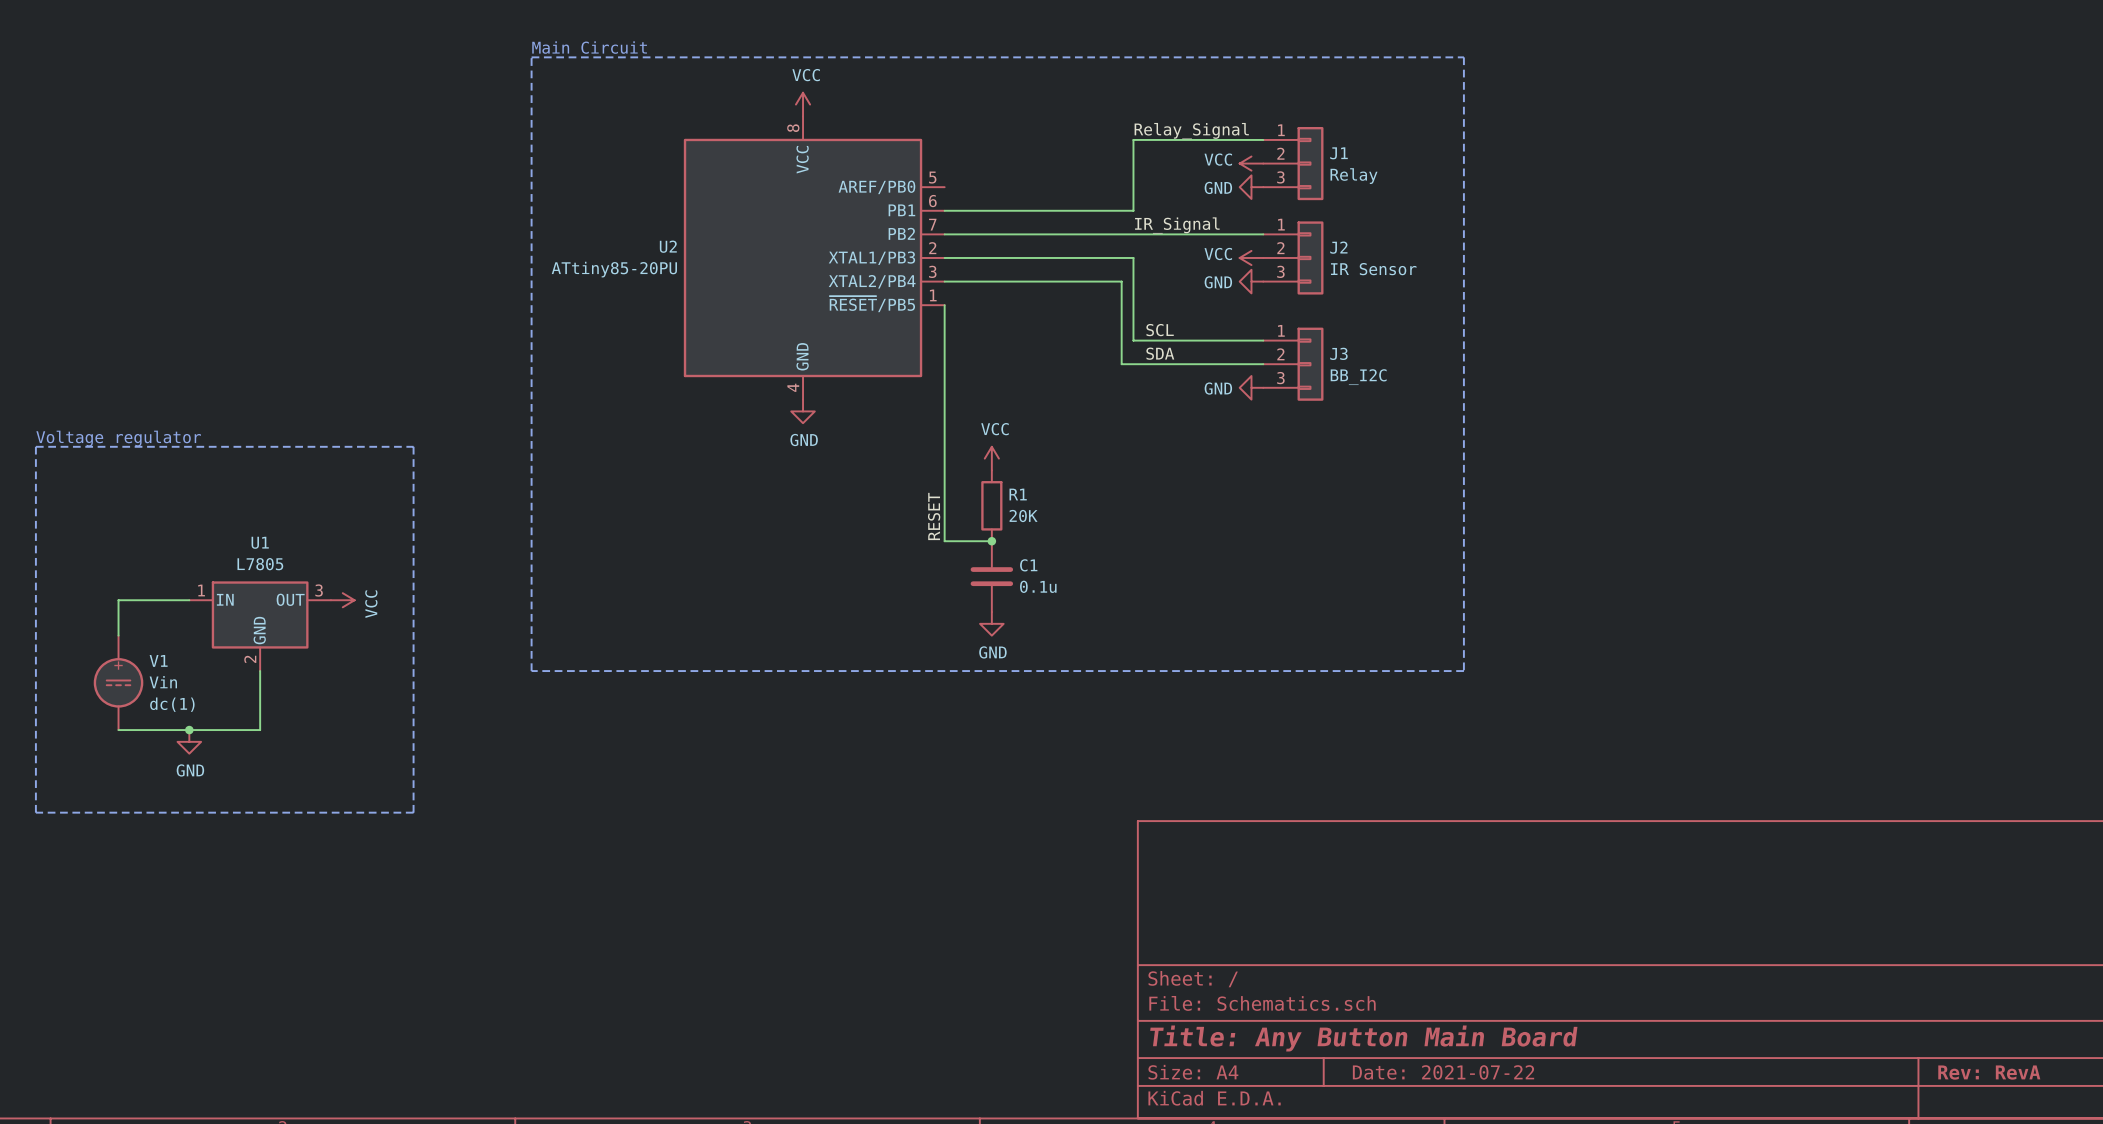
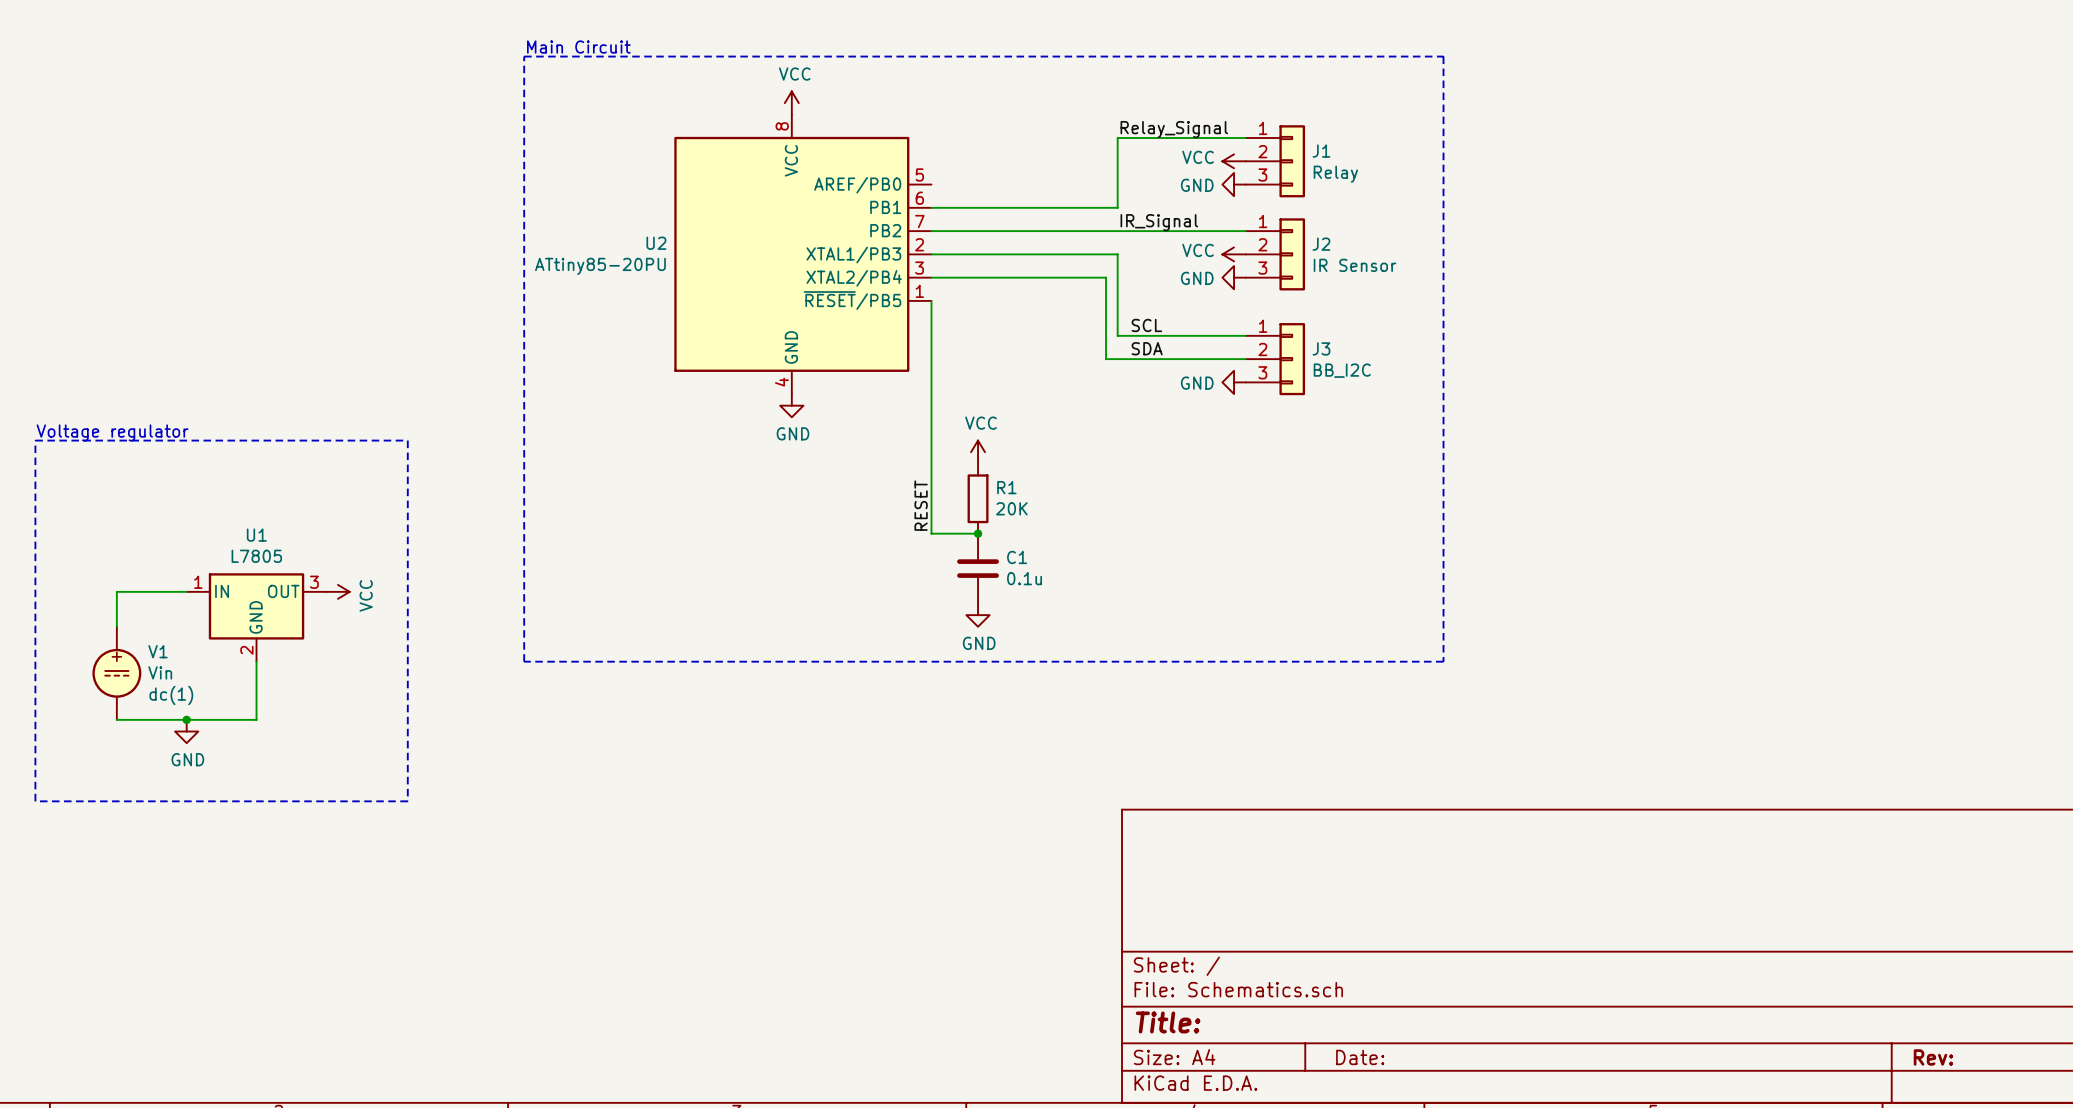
title block: Title: Any Button Main Board (1363, 1038) -> Title: (1168, 1022)
title block: Date: 2021-07-22 (1443, 1072) -> Date: (1360, 1057)
title block: Rev: RevA (1989, 1072) -> Rev: (1933, 1057)

